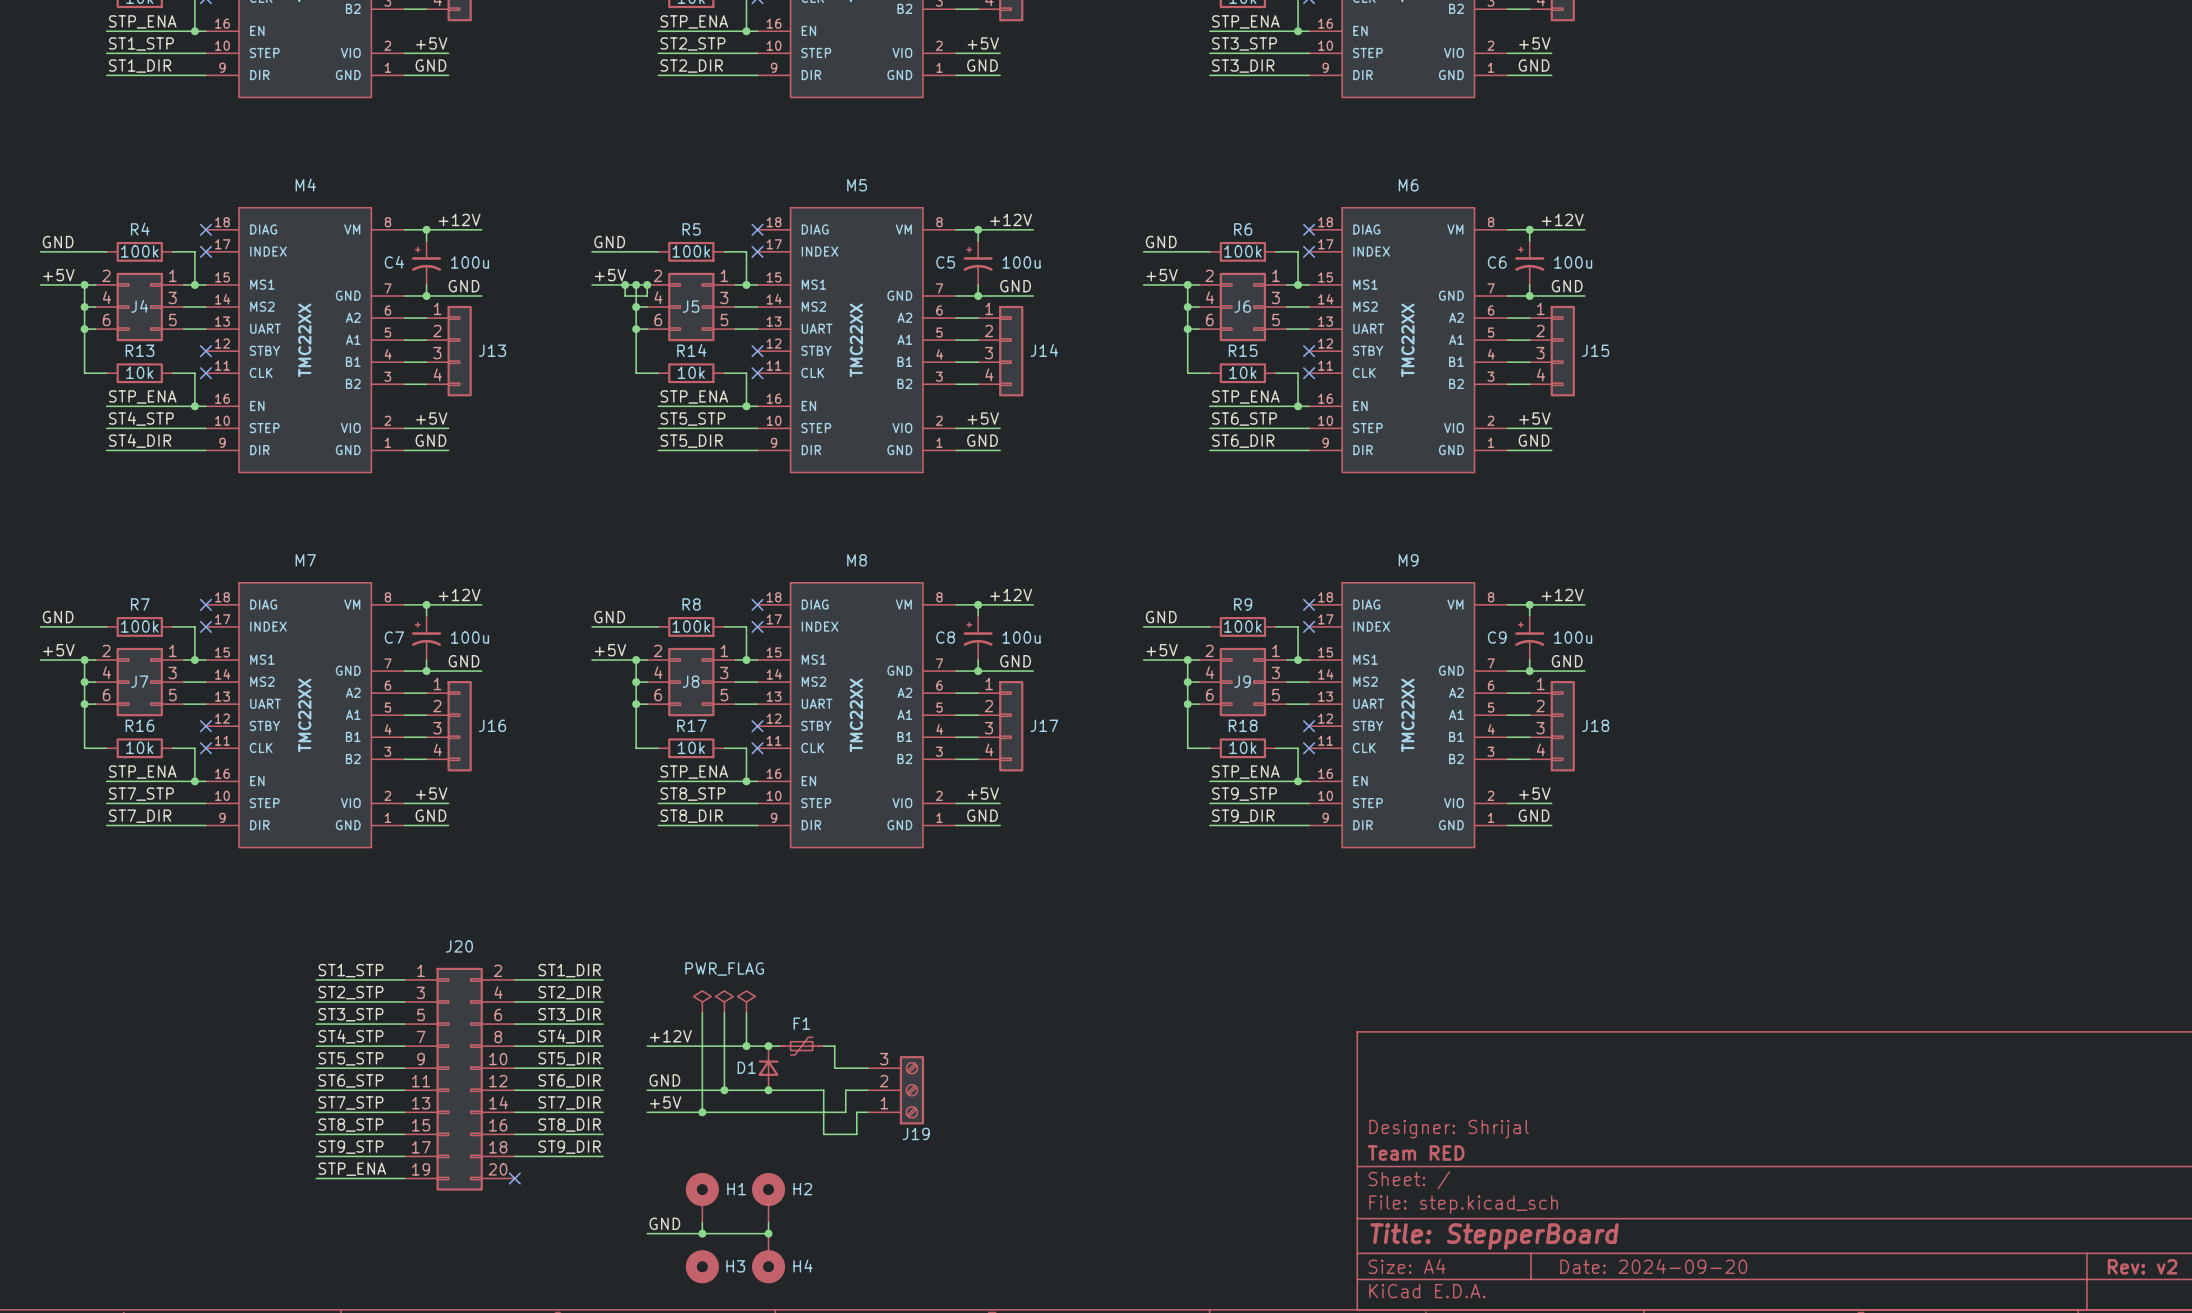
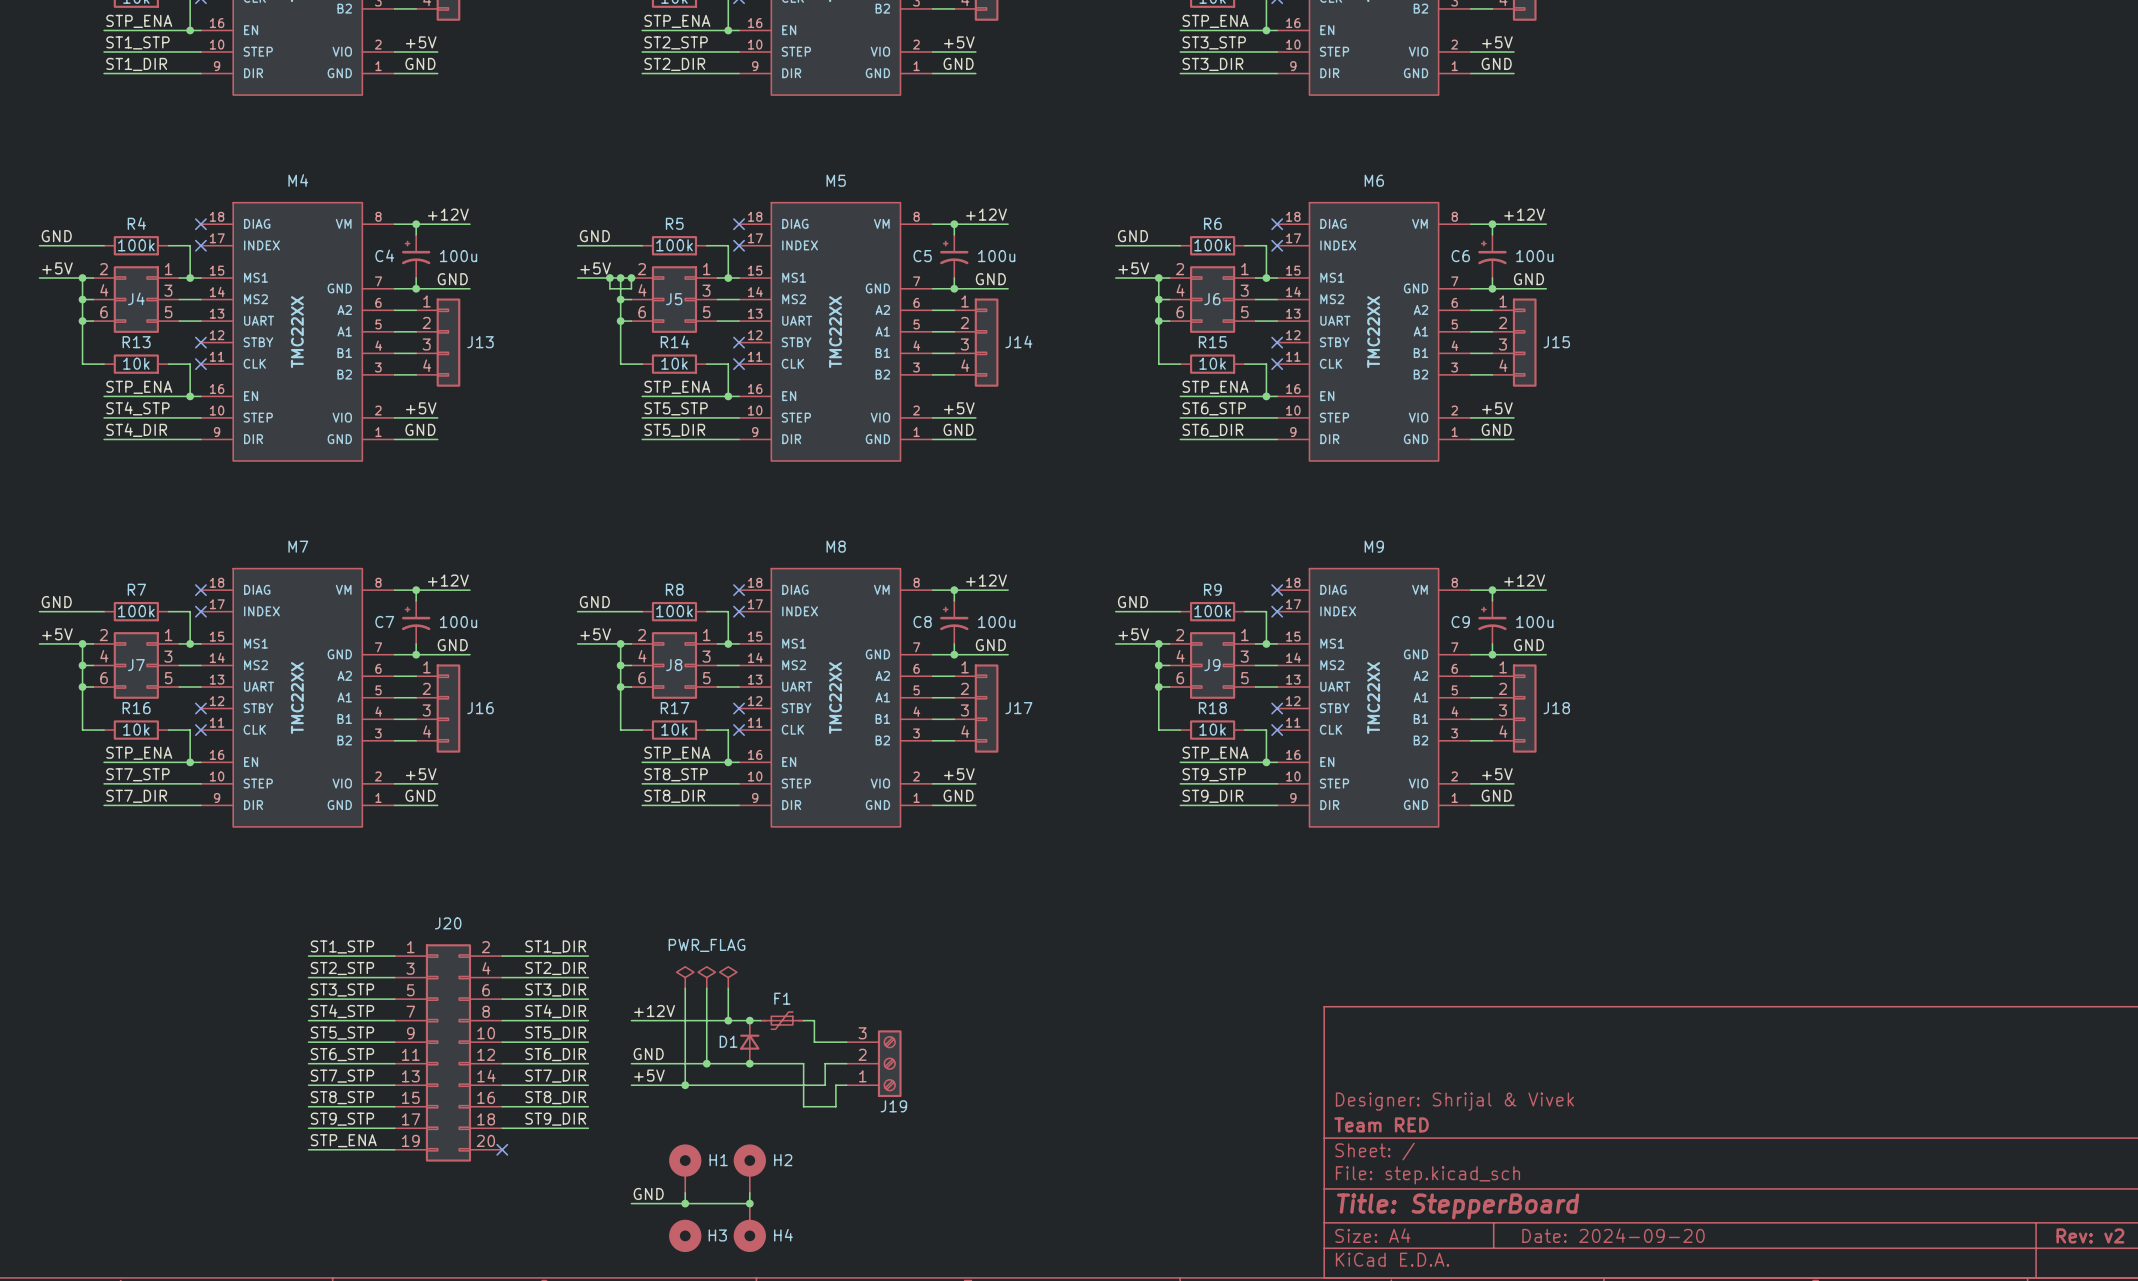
title block: Designer: Shrijal (1449, 1129) -> Designer: Shrijal & Vivek (1454, 1101)

